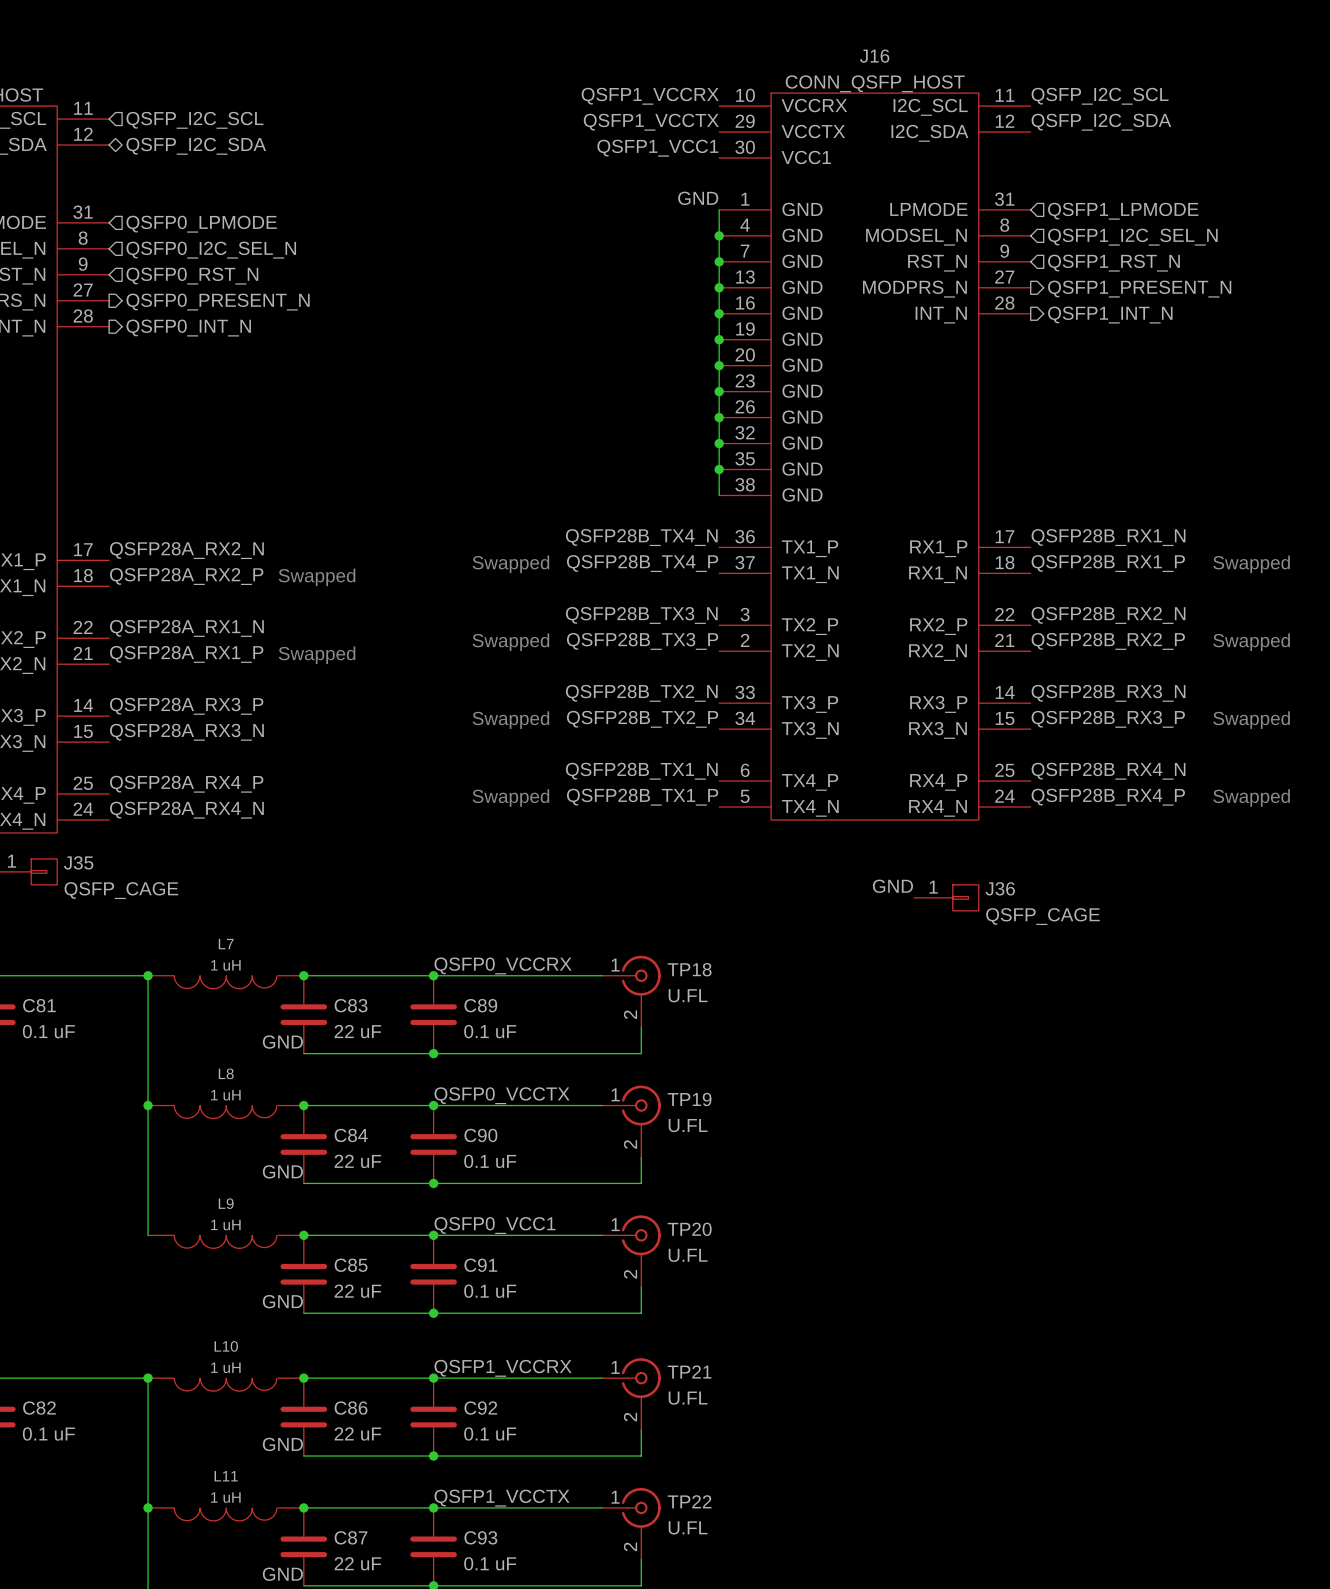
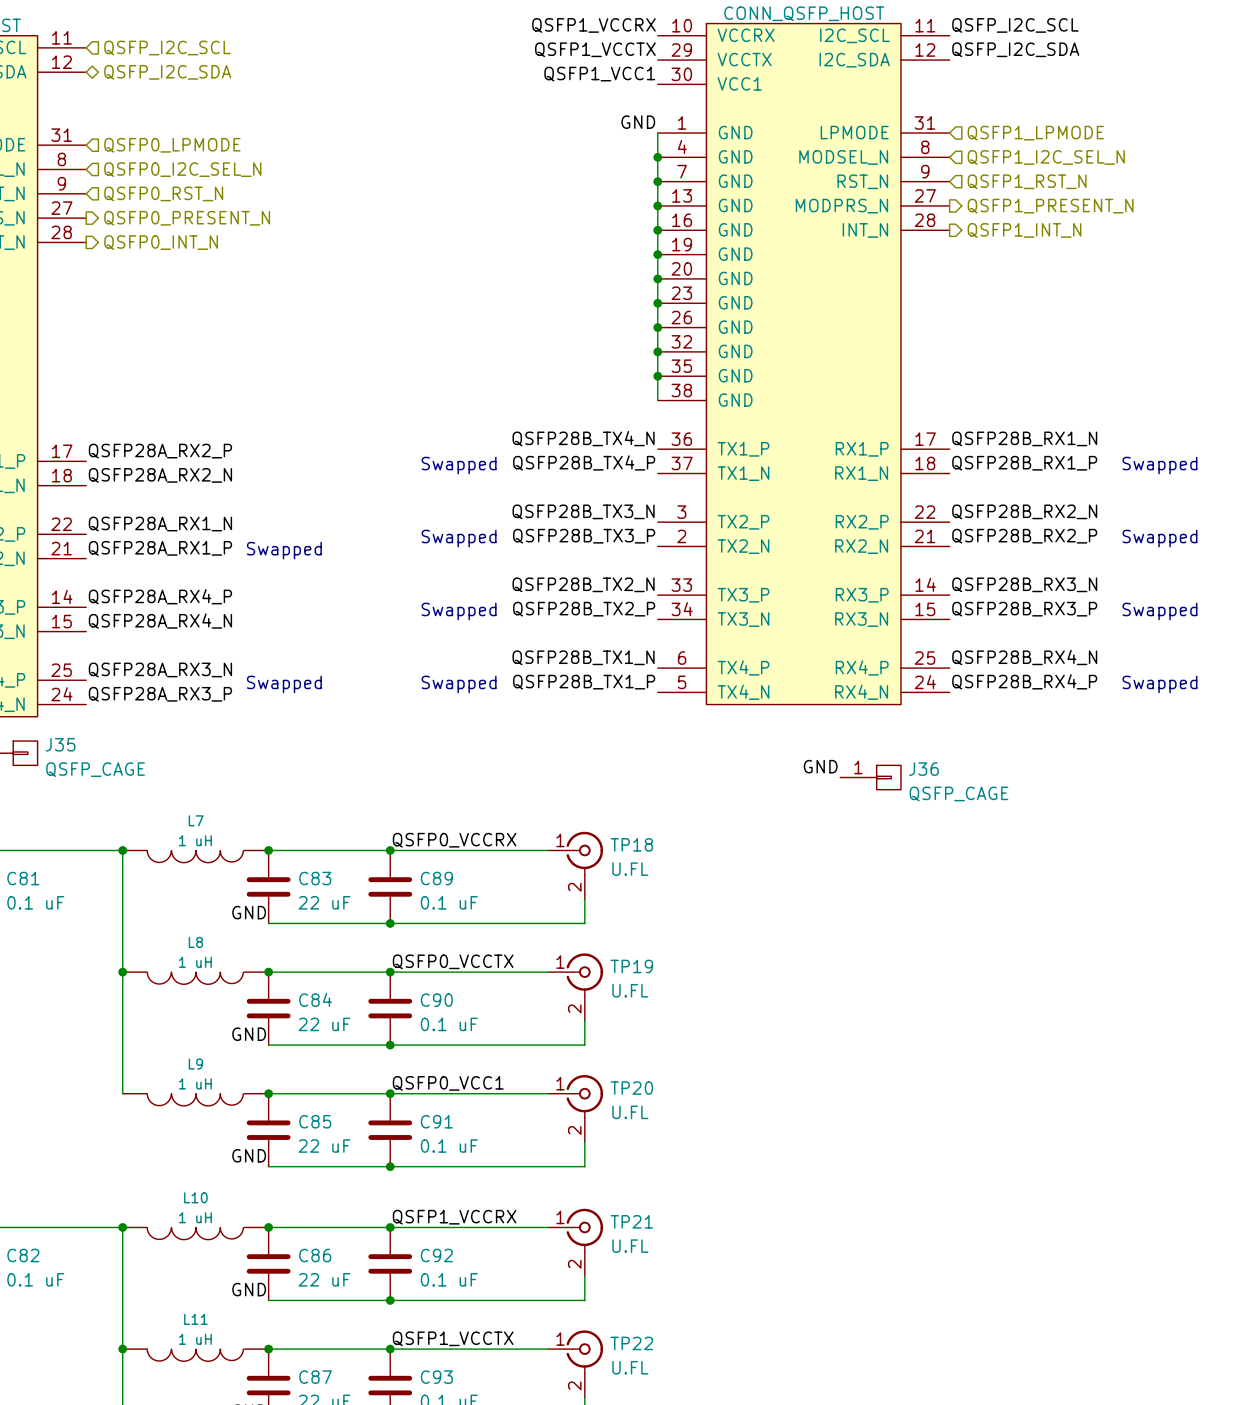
label: QSFP28A_RX2_N (186, 550) -> QSFP28A_RX2_P (160, 451)
label: QSFP28A_RX2_P (186, 576) -> QSFP28A_RX2_N (160, 475)
text position: Swapped (317, 577) -> Swapped (284, 684)
label: QSFP28A_RX3_P (186, 706) -> QSFP28A_RX4_P (160, 596)
label: QSFP28A_RX3_N (186, 732) -> QSFP28A_RX4_N (160, 621)
label: QSFP28A_RX4_P (186, 784) -> QSFP28A_RX3_N (160, 669)
label: QSFP28A_RX4_N (186, 810) -> QSFP28A_RX3_P (160, 694)

